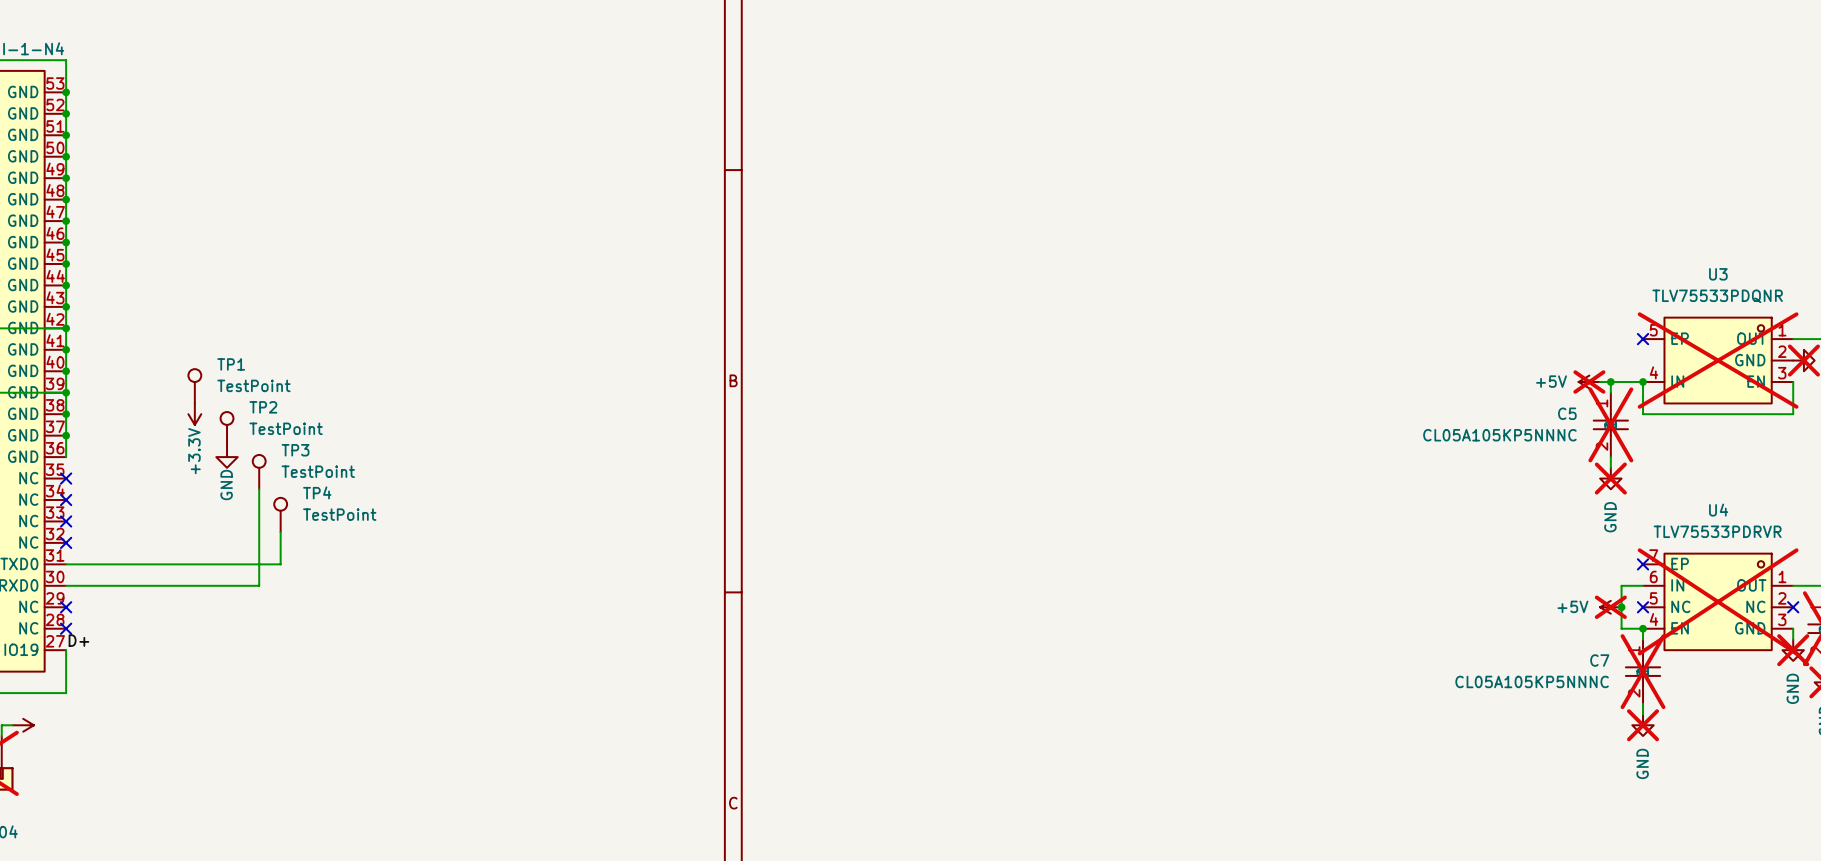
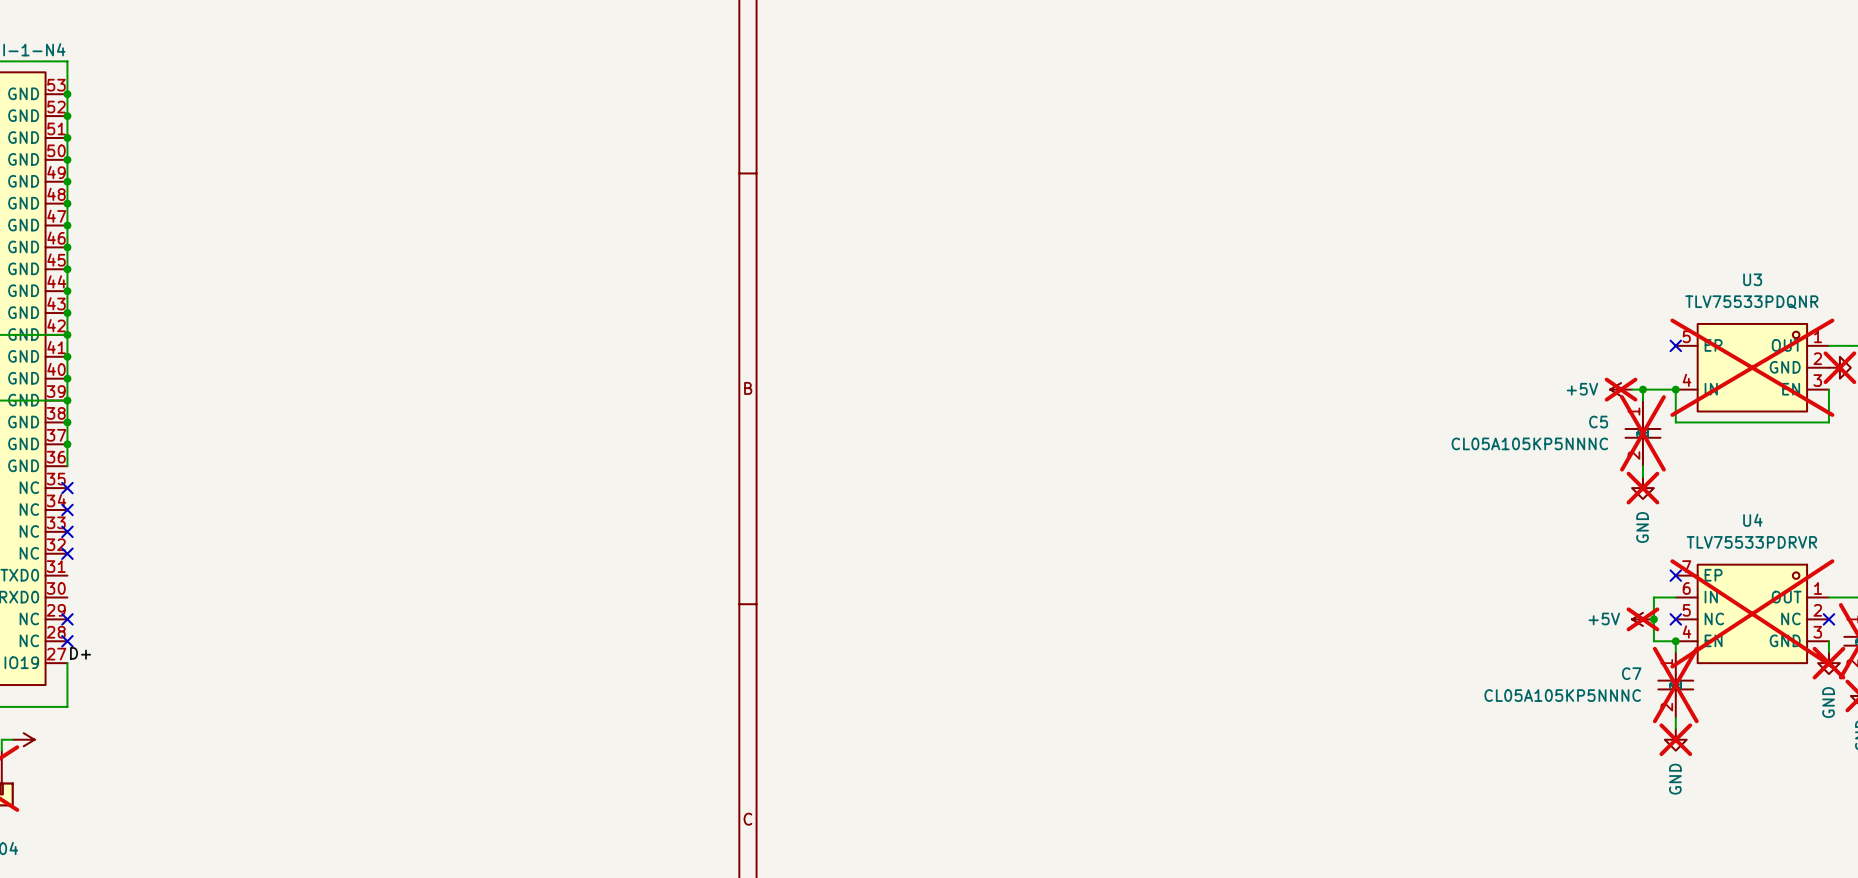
TP1: TestPoint (194, 386) -> none
power symbol: +3.3V (194, 414) -> none
TP2: TestPoint (227, 429) -> none
power symbol: GND (227, 457) -> none
TP3: TestPoint (259, 472) -> none
wire: (259, 489) (259, 585) (66, 585) -> none
TP4: TestPoint (280, 515) -> none
wire: (280, 532) (280, 564) (66, 564) -> none

